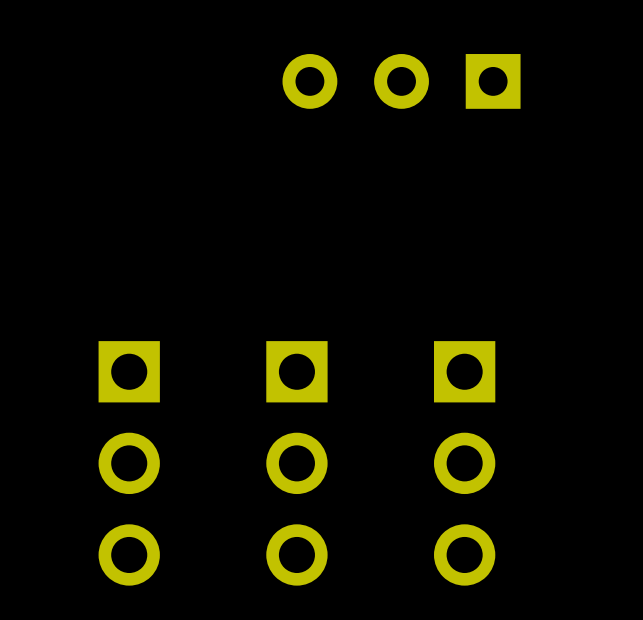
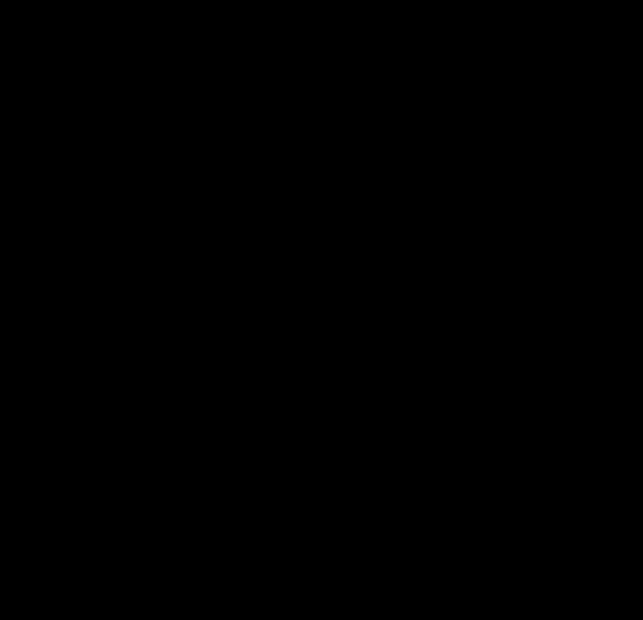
part: (401, 81) -> none
part: (129, 463) -> none
part: (296, 463) -> none
part: (464, 463) -> none

